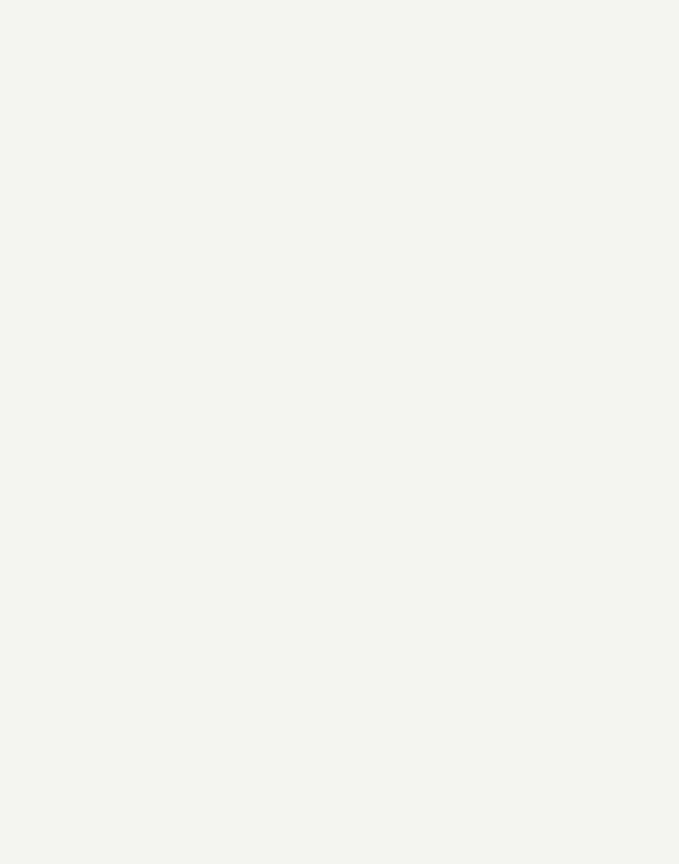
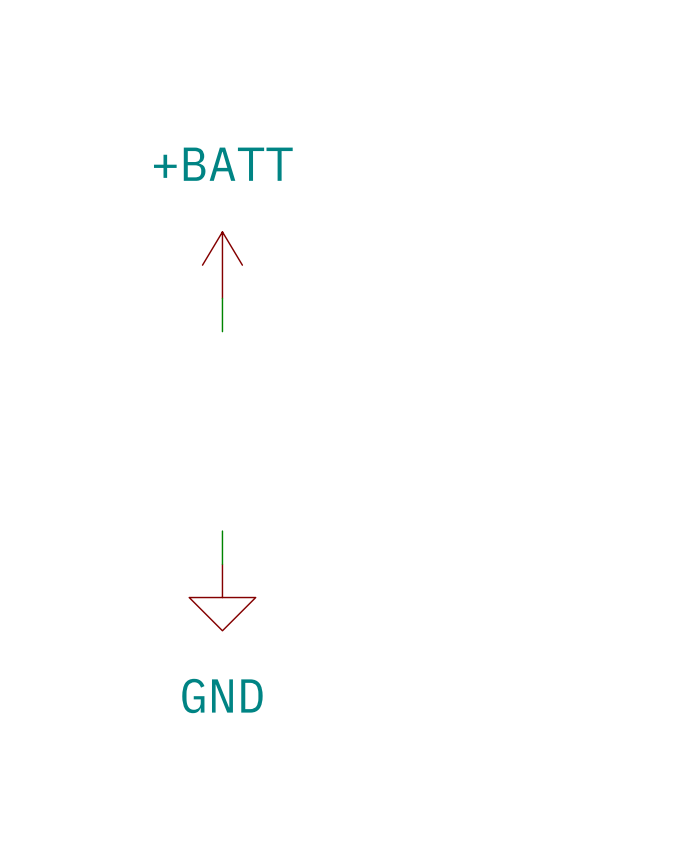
power symbol: none -> +BATT (222, 265)
wire: none -> (222, 298) (222, 331)
wire: none -> (222, 531) (222, 564)
power symbol: none -> GND (222, 597)

